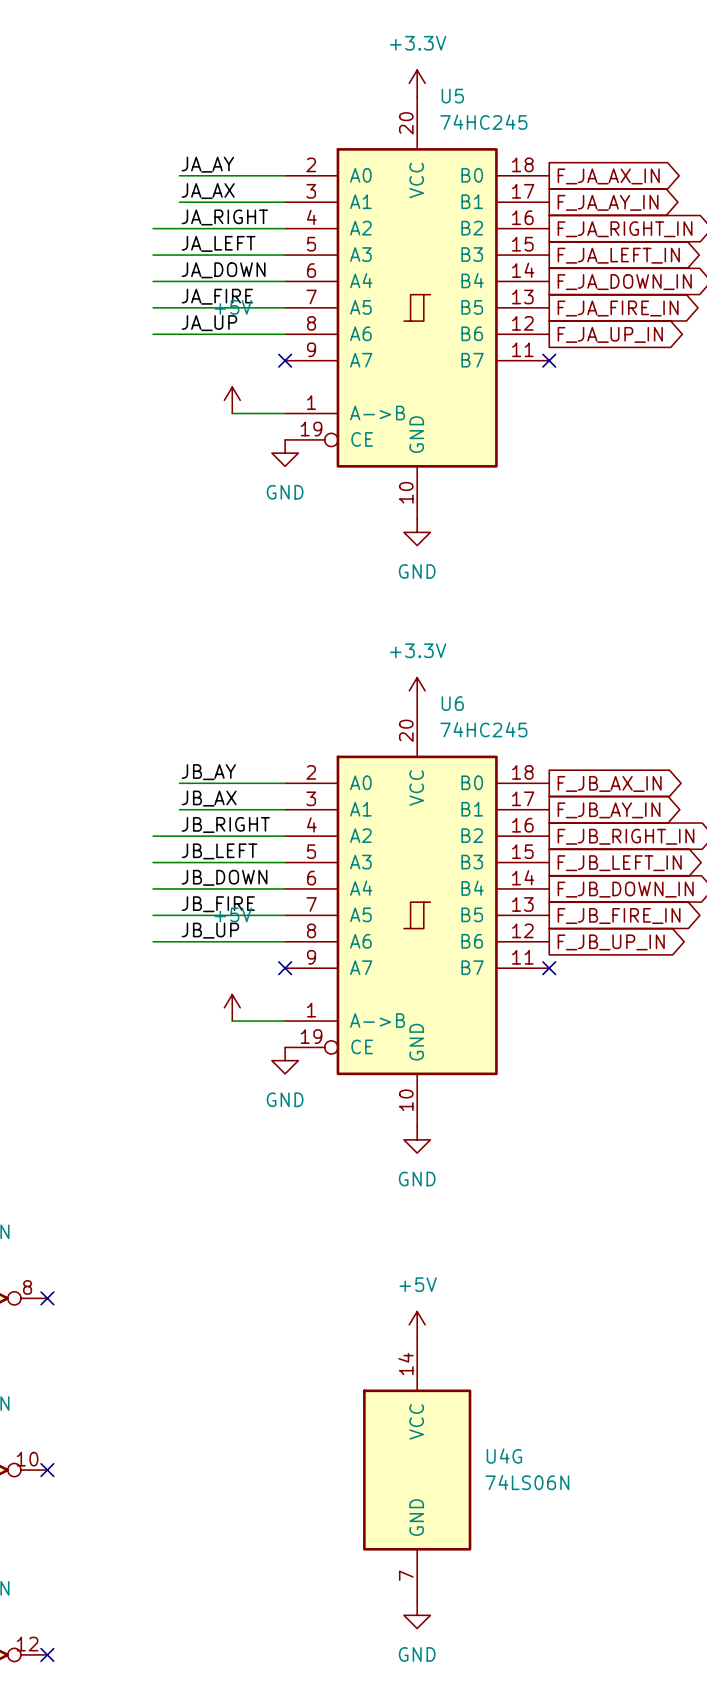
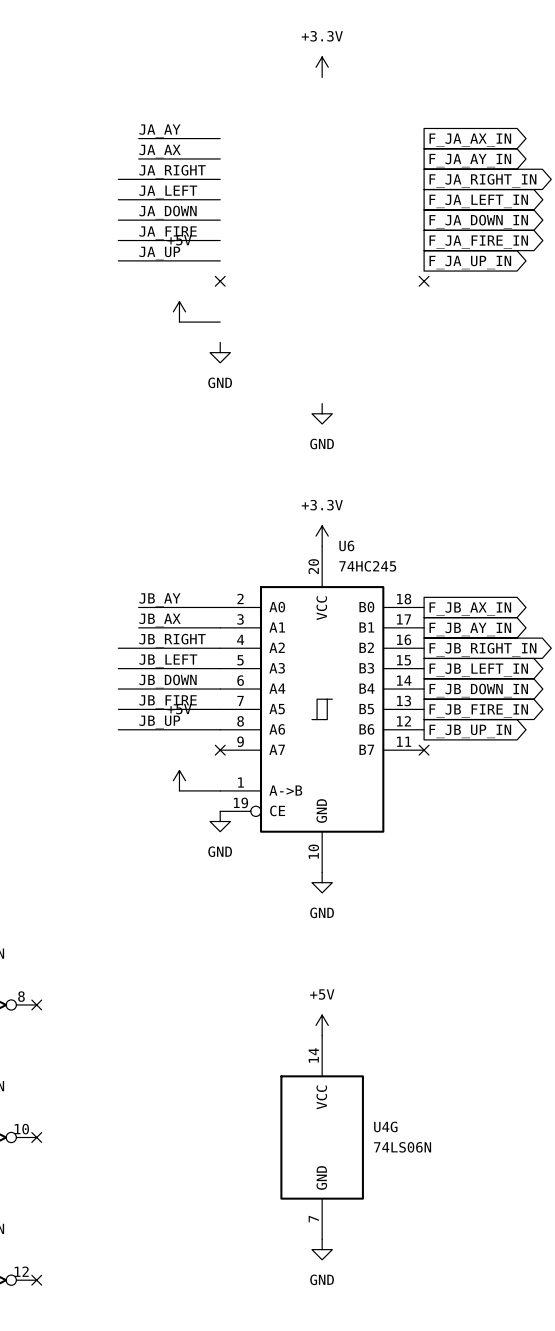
U5: 74HC245 (417, 307) -> none

